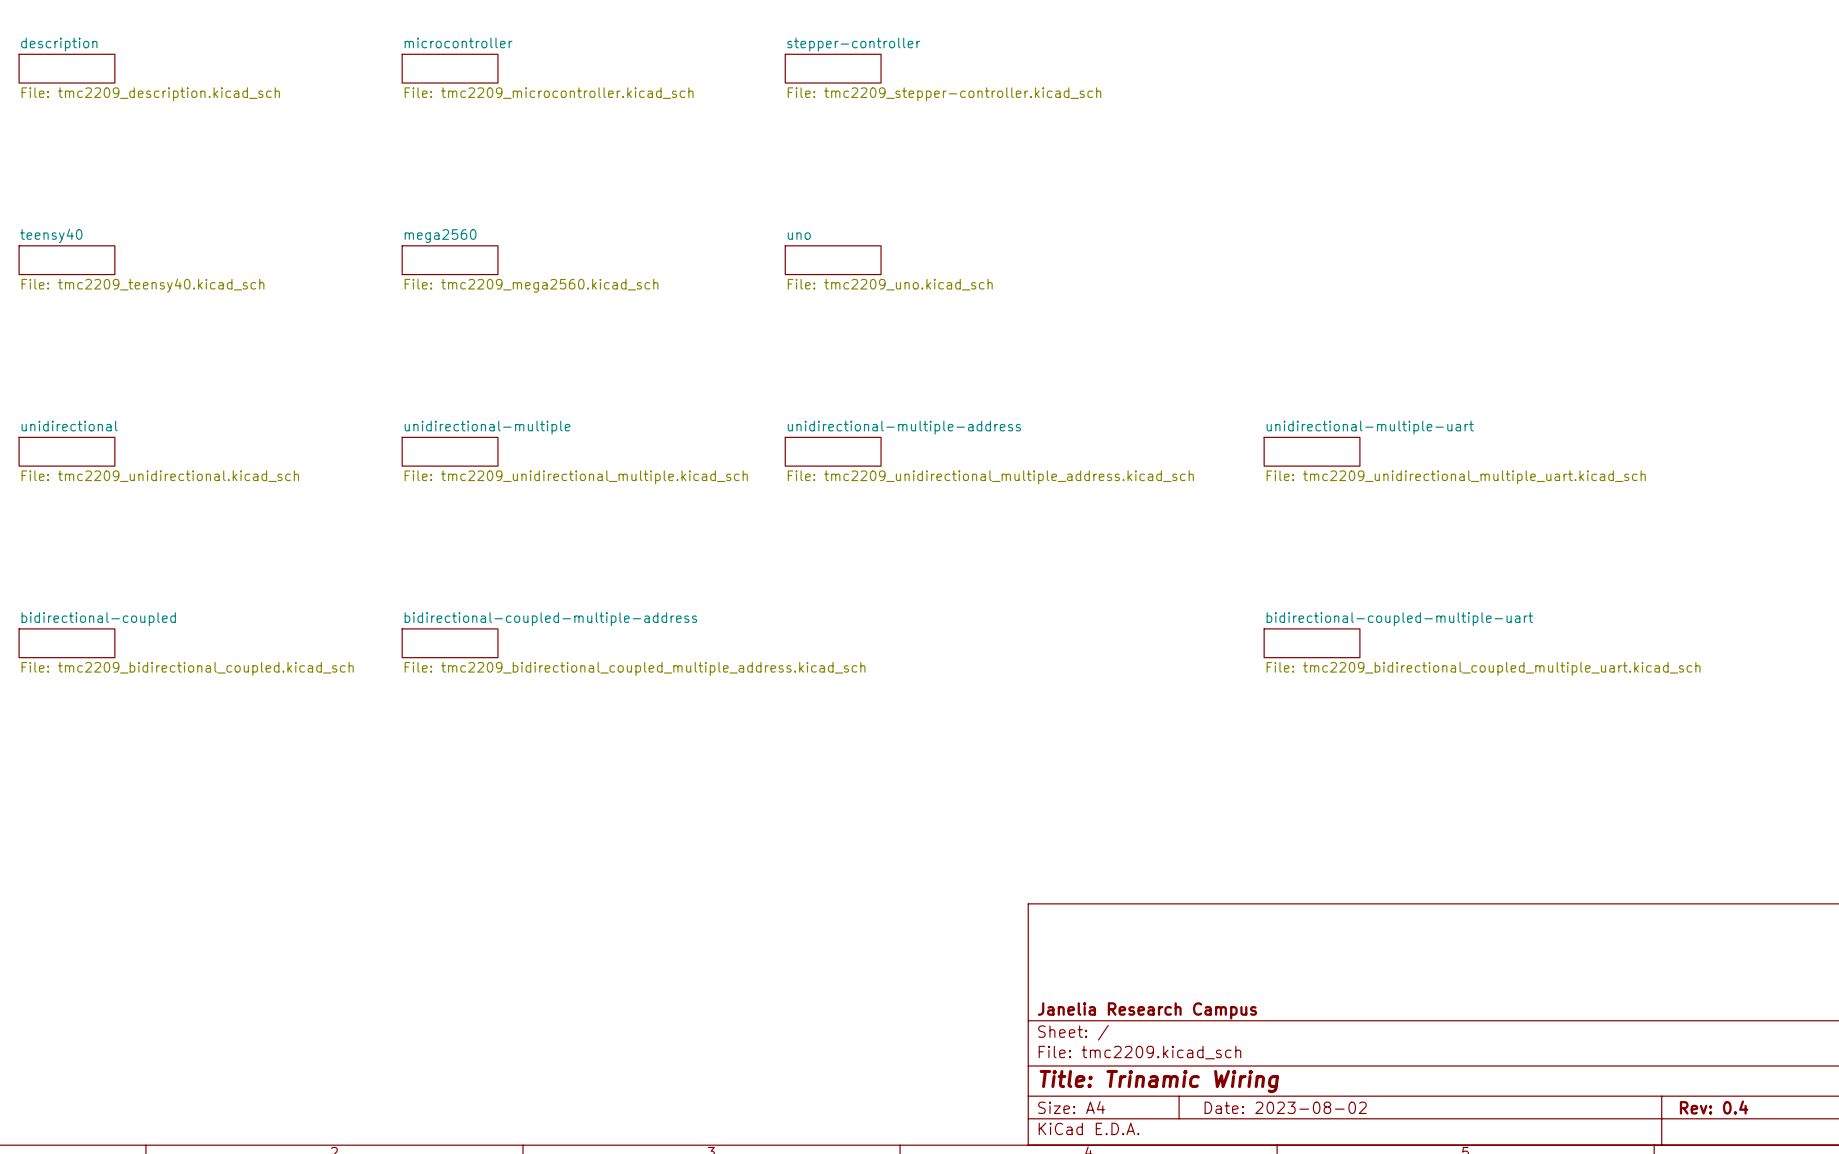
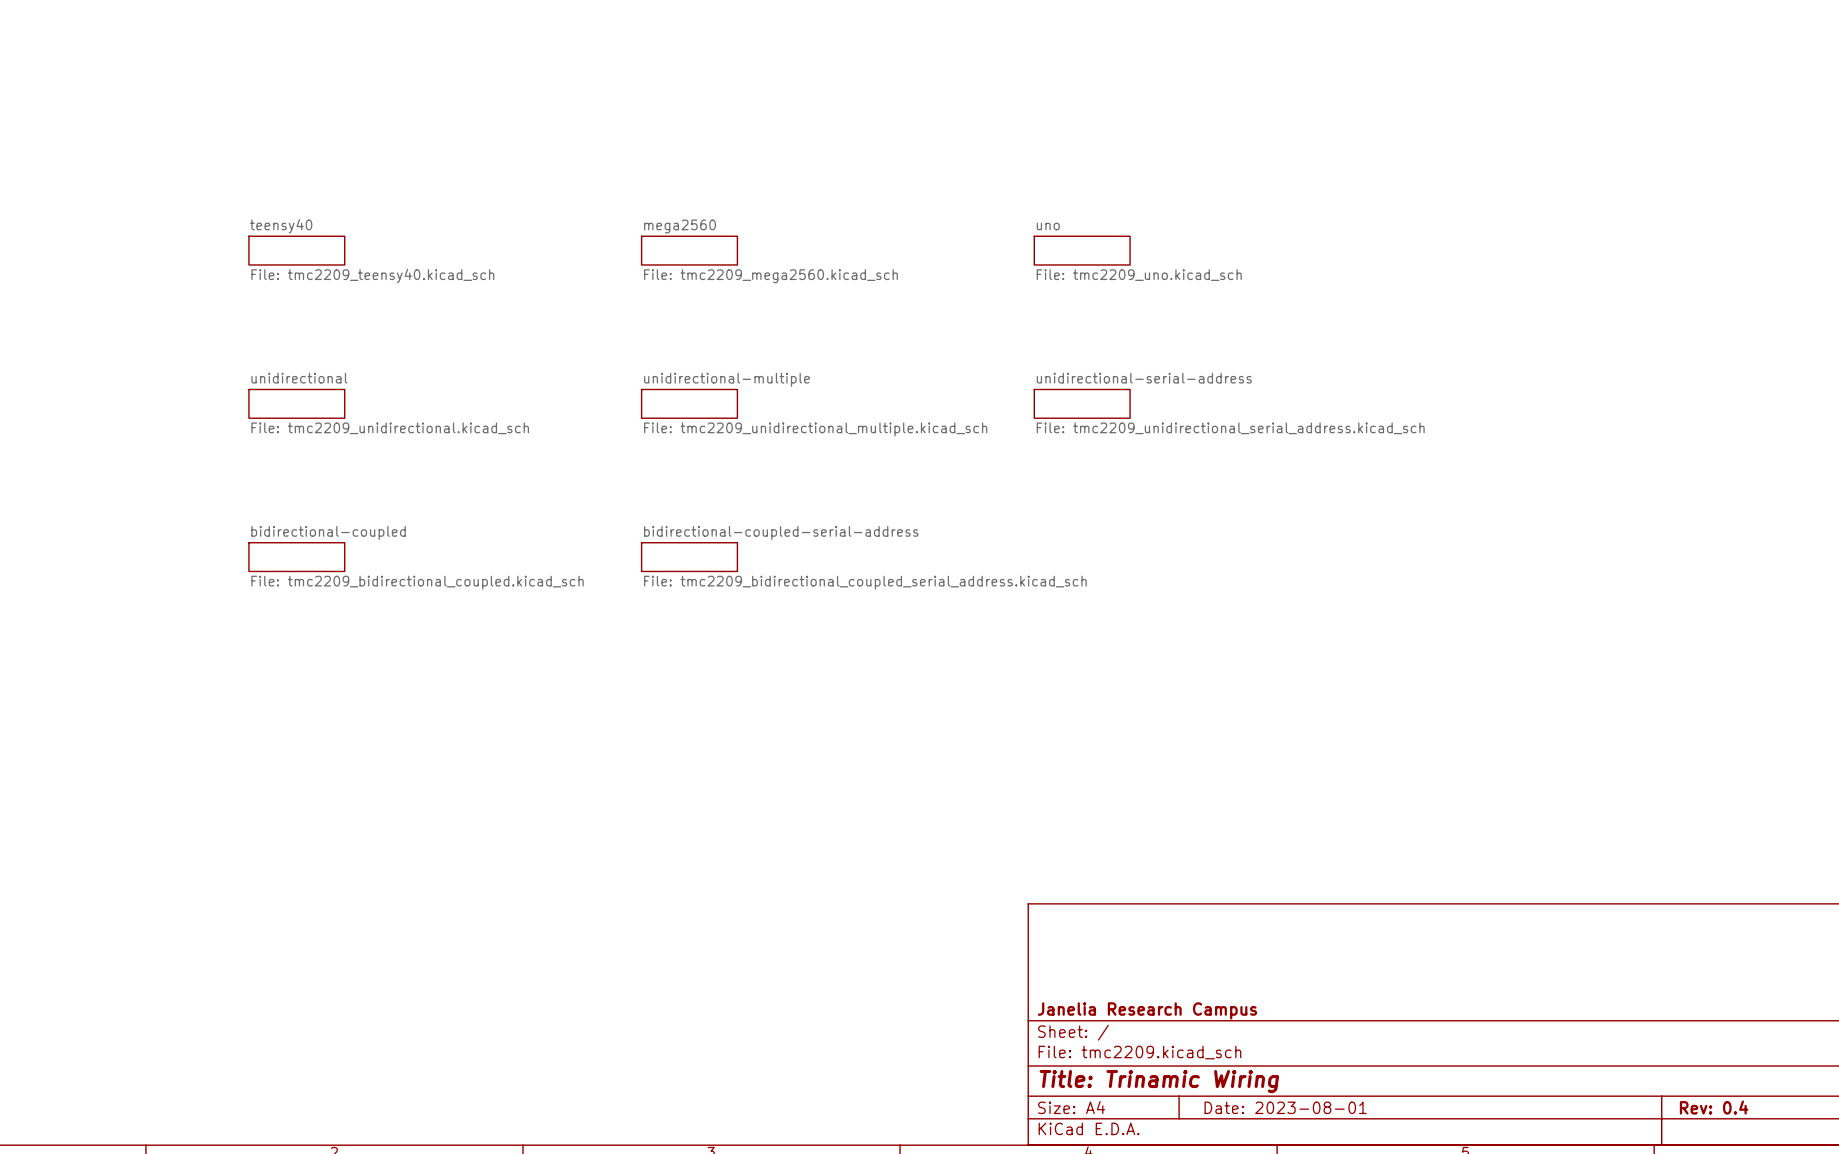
sheet description: File: tmc2209_description.kicad_sch (66, 68) -> none
sheet microcontroller: File: tmc2209_microcontroller.kicad_sch (450, 68) -> none
sheet stepper-controller: File: tmc2209_stepper-controller.kicad_sch (833, 68) -> none
sheet uno: none -> File: tmc2209_uno.kicad_sch (1082, 250)
sheet teensy40 position: (66, 260) -> (296, 250)
sheet mega2560 position: (450, 260) -> (689, 250)
sheet uno: File: tmc2209_uno.kicad_sch (833, 260) -> none
sheet unidirectional: none -> File: tmc2209_unidirectional.kicad_sch (296, 403)
sheet unidirectional-multiple: none -> File: tmc2209_unidirectional_multiple.kicad_sch (689, 403)
sheet unidirectional-serial-address: none -> File: tmc2209_unidirectional_serial_address.kicad_sch (1082, 403)
sheet unidirectional: File: tmc2209_unidirectional.kicad_sch (66, 451) -> none
sheet unidirectional-multiple: File: tmc2209_unidirectional_multiple.kicad_sch (450, 451) -> none
sheet unidirectional-multiple-address: File: tmc2209_unidirectional_multiple_address.kicad_sch (833, 451) -> none
sheet unidirectional-multiple-uart: File: tmc2209_unidirectional_multiple_uart.kicad_sch (1312, 451) -> none
sheet bidirectional-coupled: none -> File: tmc2209_bidirectional_coupled.kicad_sch (296, 557)
sheet bidirectional-coupled-serial-address: none -> File: tmc2209_bidirectional_coupled_serial_address.kicad_sch (689, 557)
sheet bidirectional-coupled: File: tmc2209_bidirectional_coupled.kicad_sch (66, 643) -> none
sheet bidirectional-coupled-multiple-address: File: tmc2209_bidirectional_coupled_multiple_address.kicad_sch (450, 643) -> none
sheet bidirectional-coupled-multiple-uart: File: tmc2209_bidirectional_coupled_multiple_uart.kicad_sch (1312, 643) -> none
title block: Date: 2023-08-02 (1285, 1107) -> Date: 2023-08-01 (1285, 1107)

